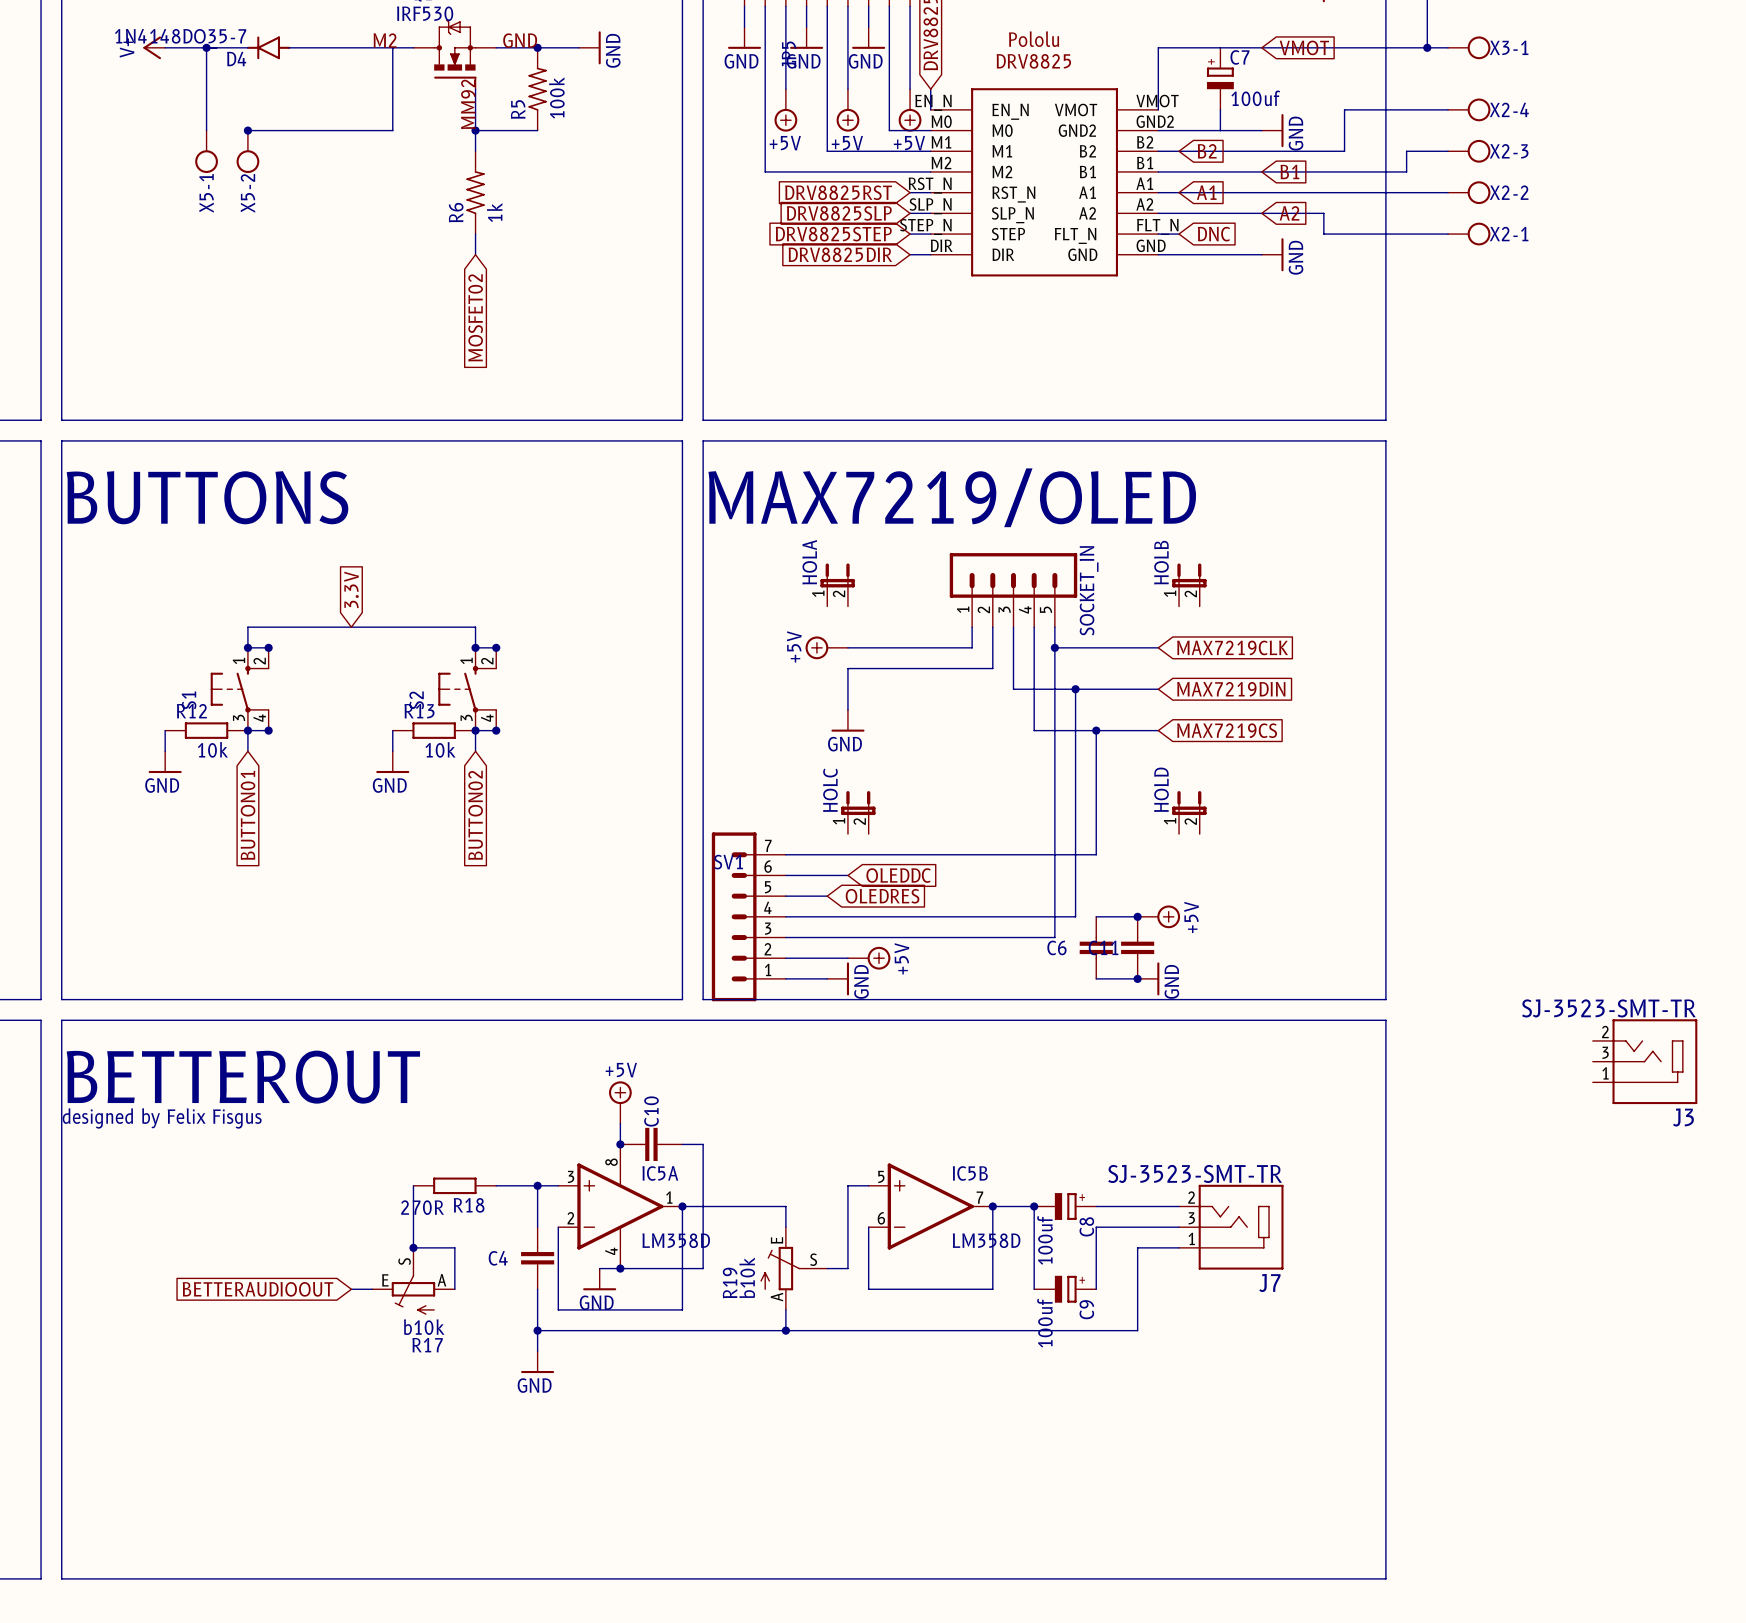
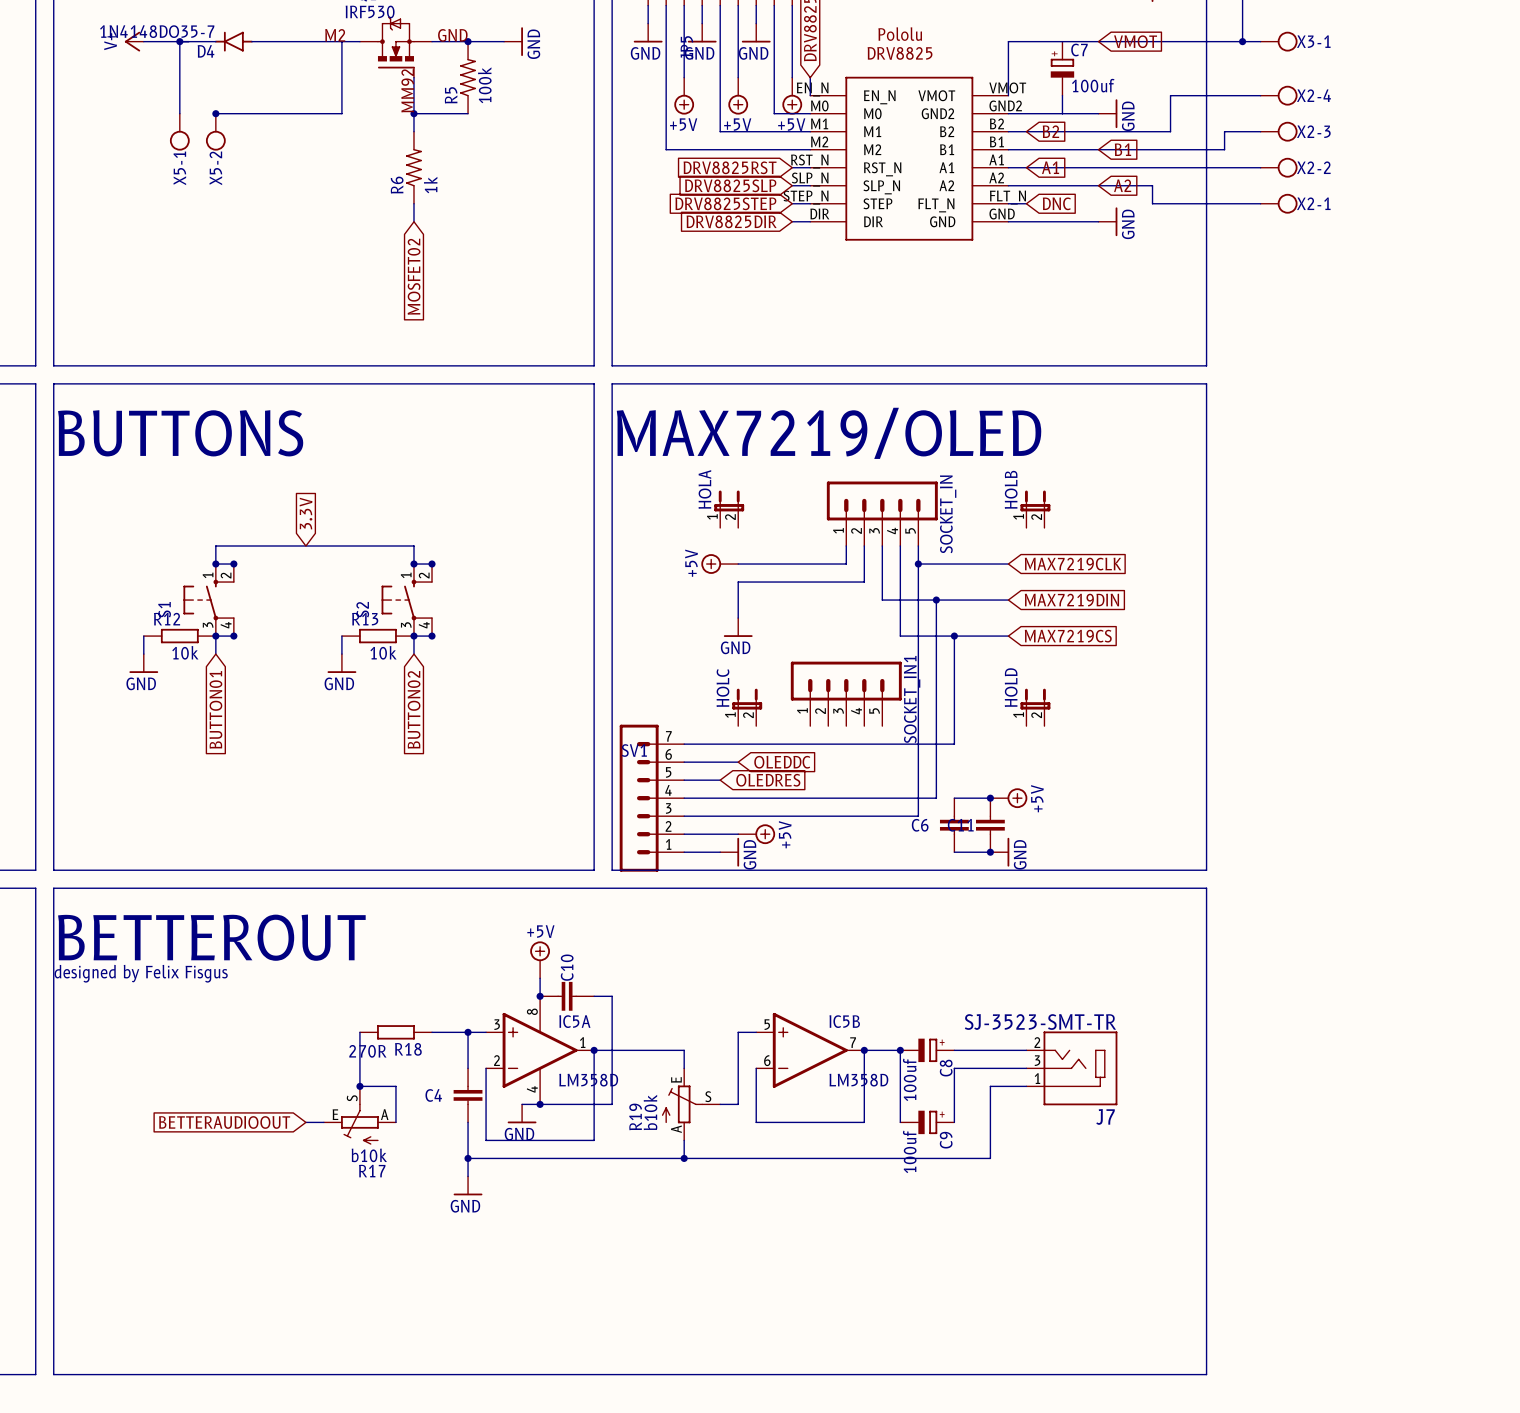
SOCKET_IN1: none -> (846, 693)
J3: SJ-3523-SMT-TR (1645, 1061) -> none

